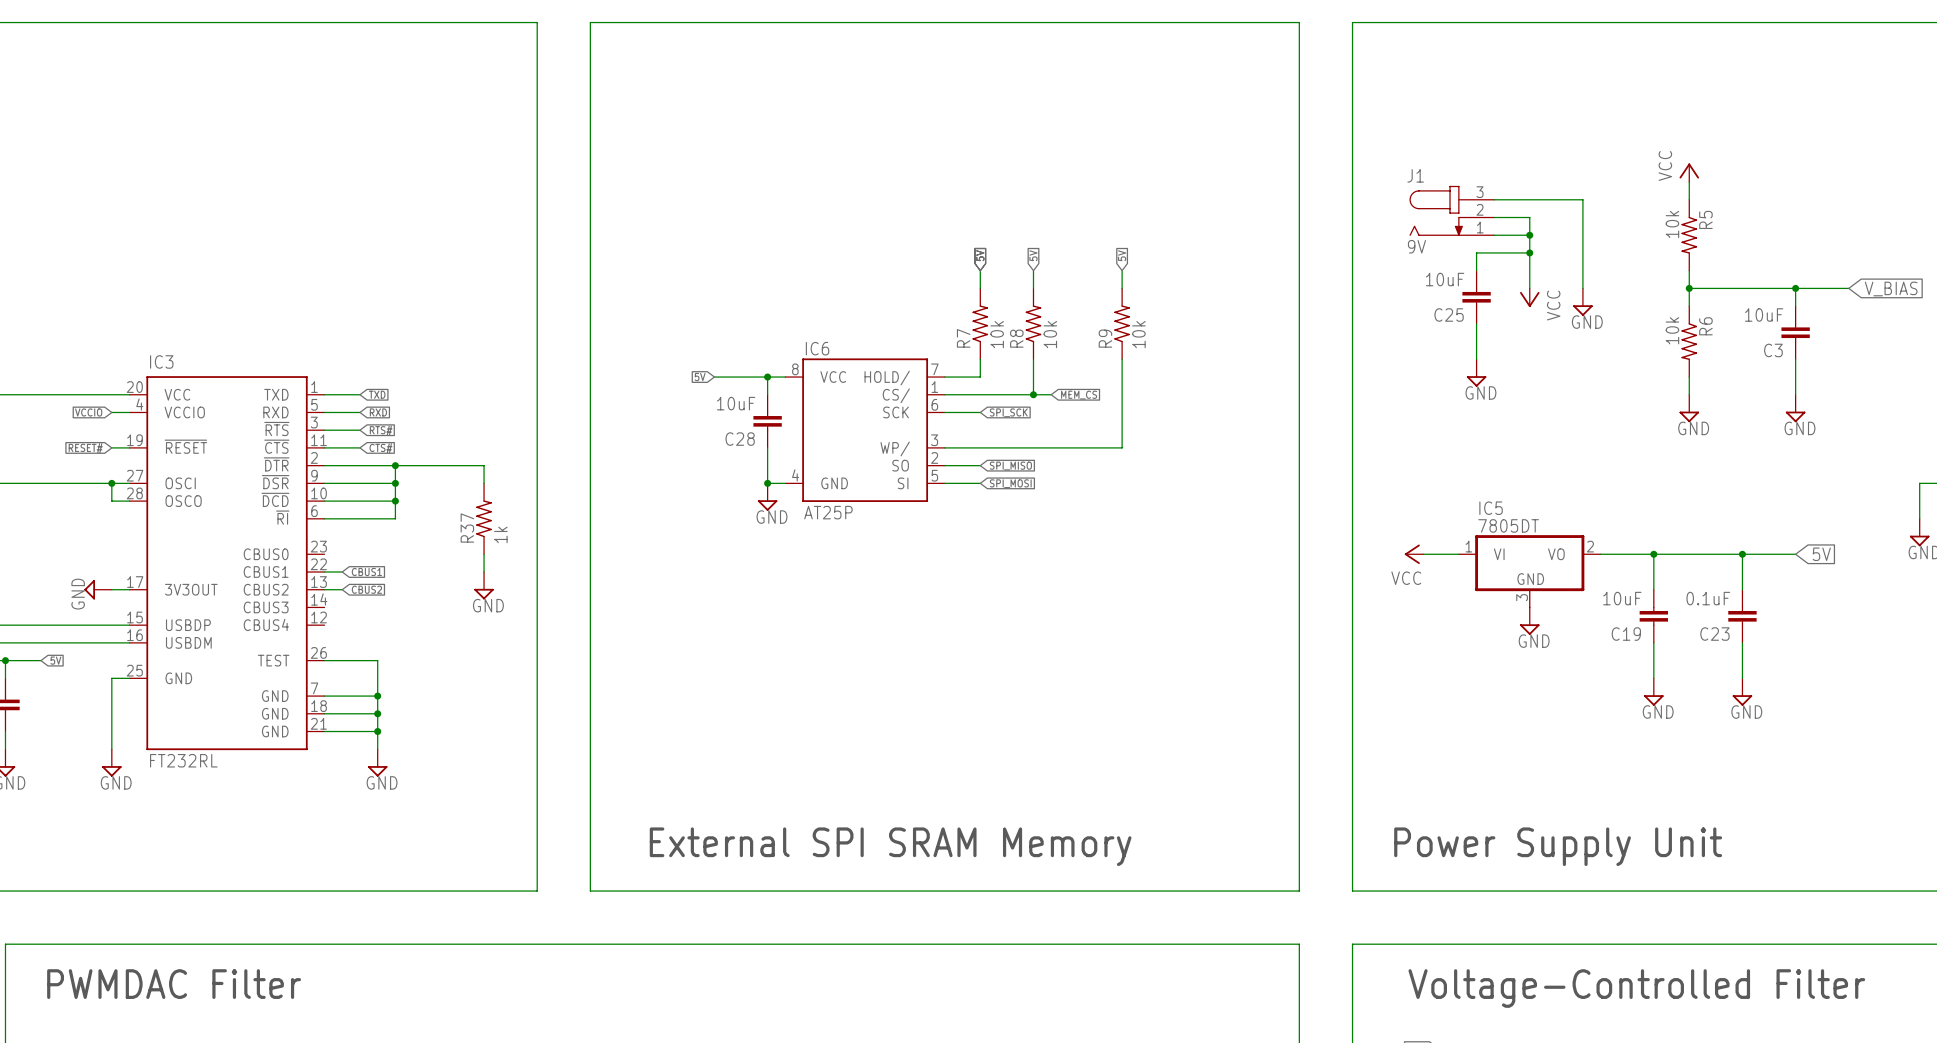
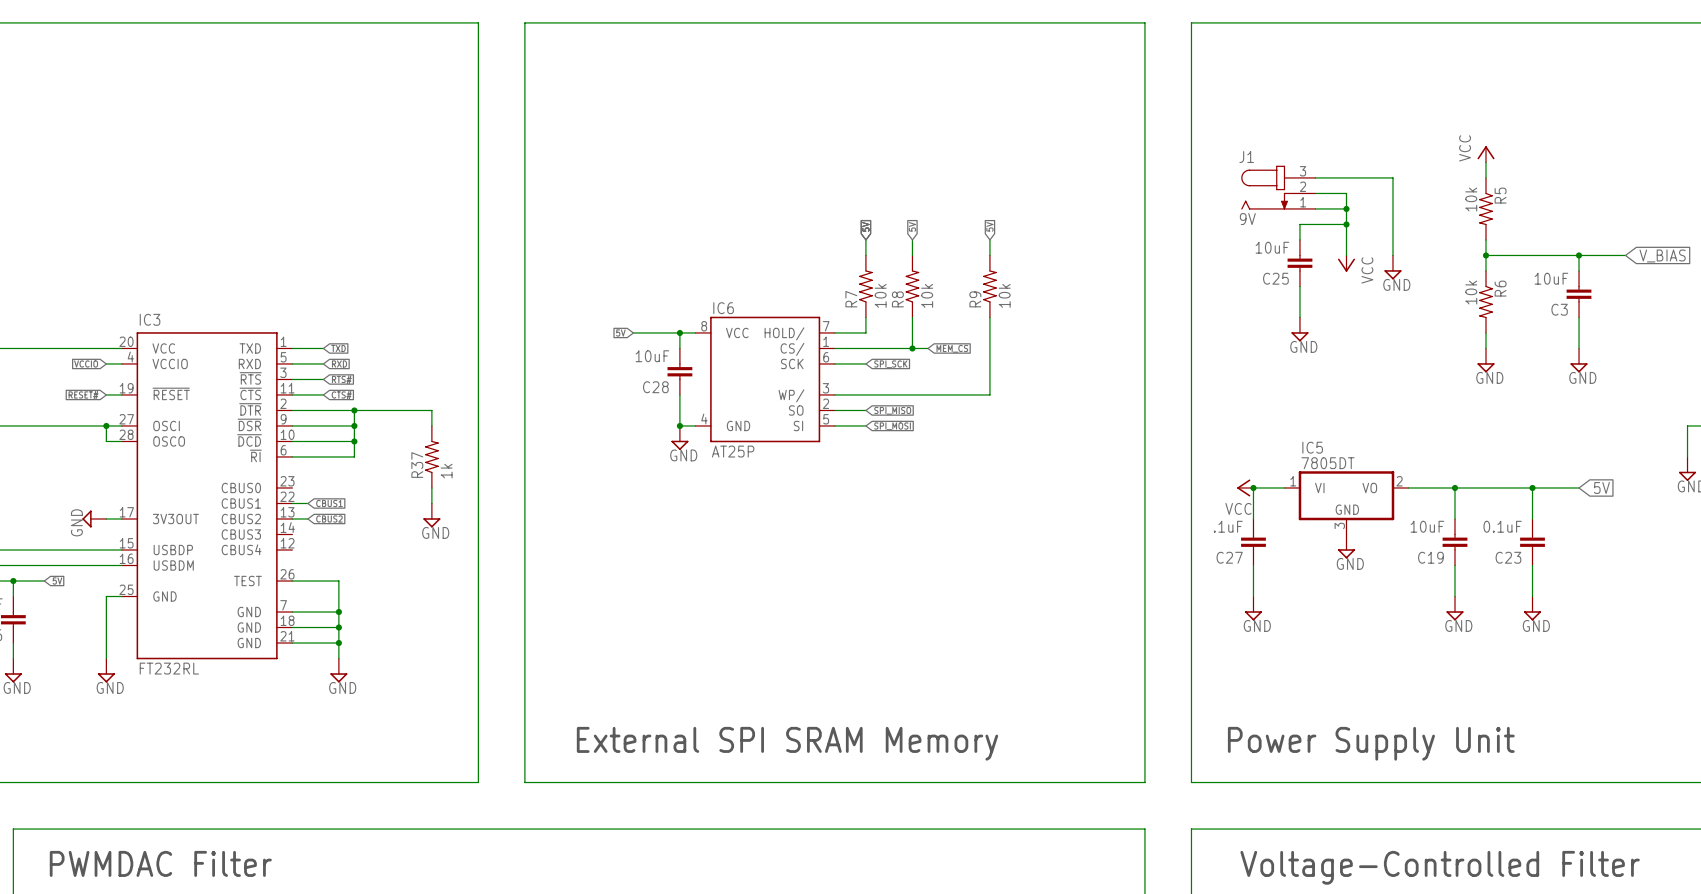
wire: none -> (1253, 487) (1253, 518)
junction: none -> (1253, 487)
C27: none -> .1uF (1253, 542)
wire: none -> (1253, 565) (1253, 596)
power symbol: none -> GND (1253, 608)

